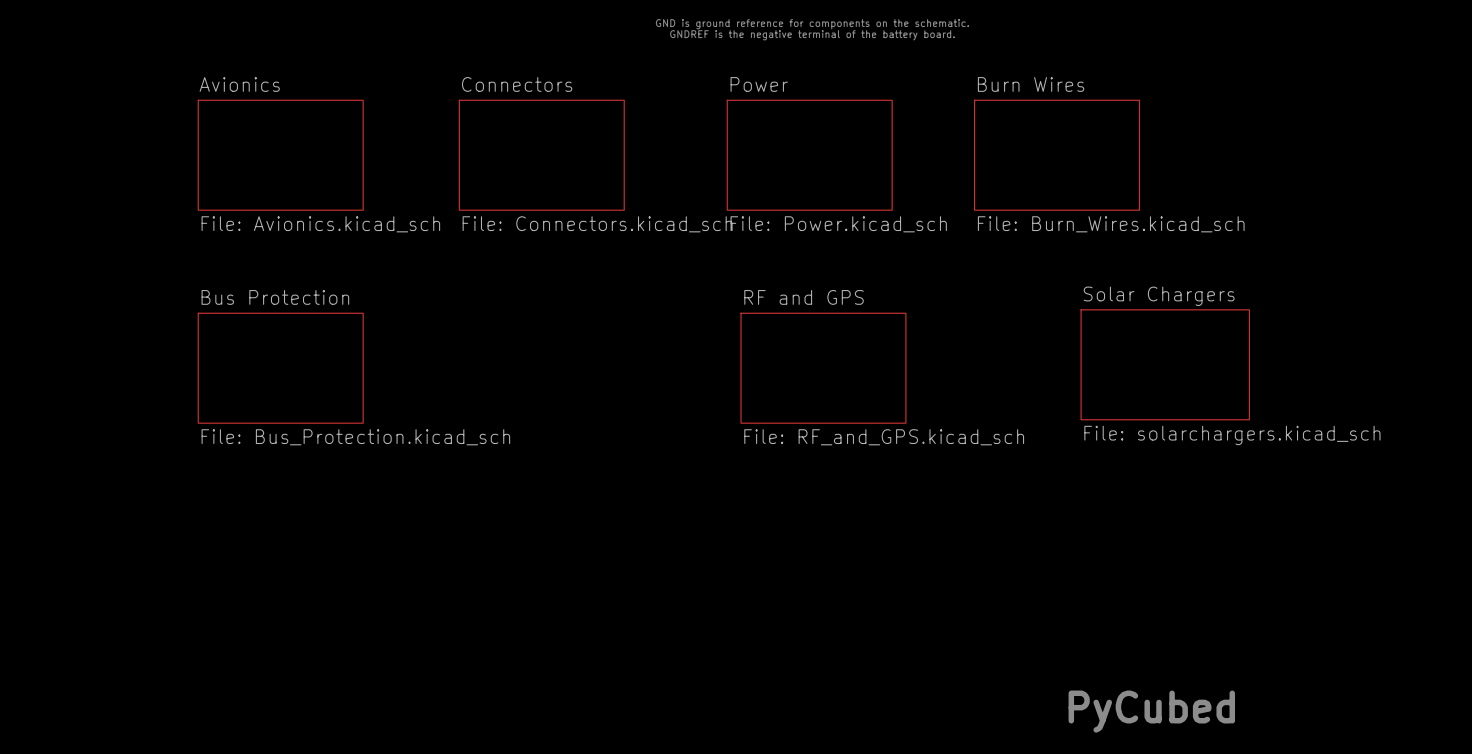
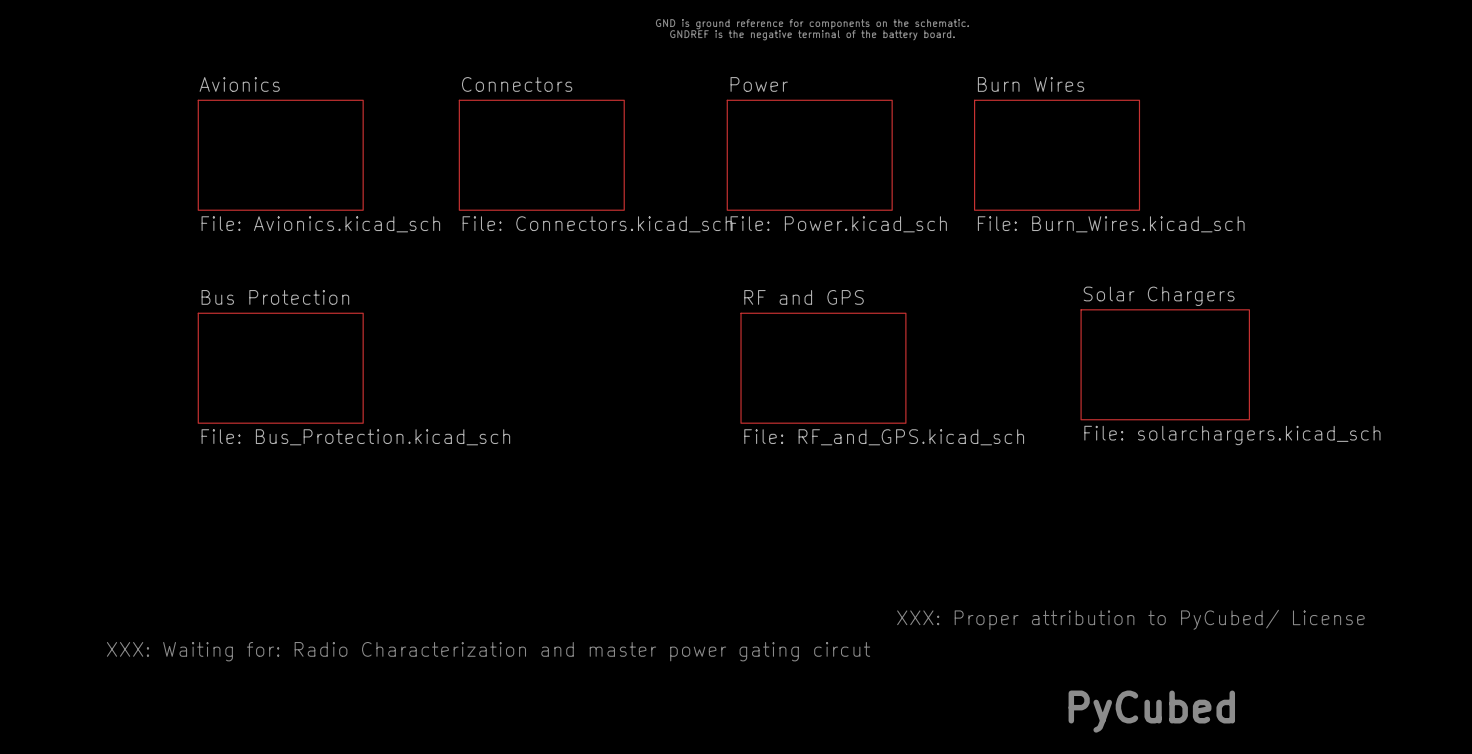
text: none -> XXX: Proper attribution to PyCubed/ License (1130, 619)
text: none -> XXX: Waiting for: Radio Characterization and master power gating circut (488, 651)

